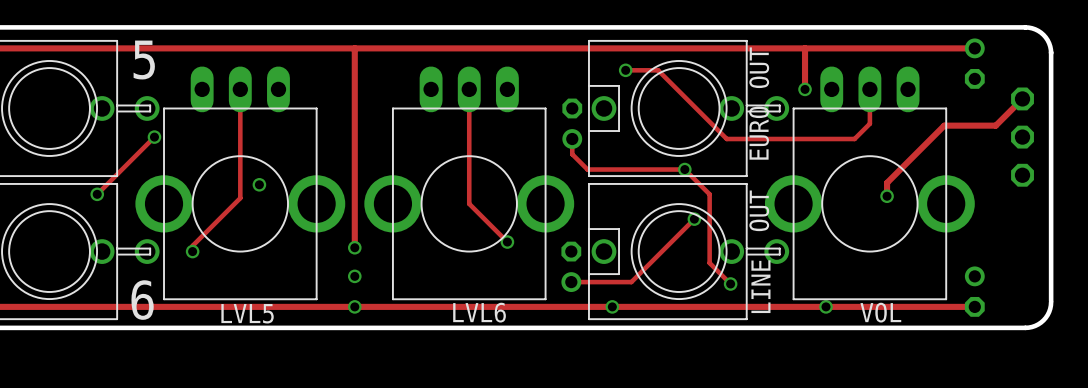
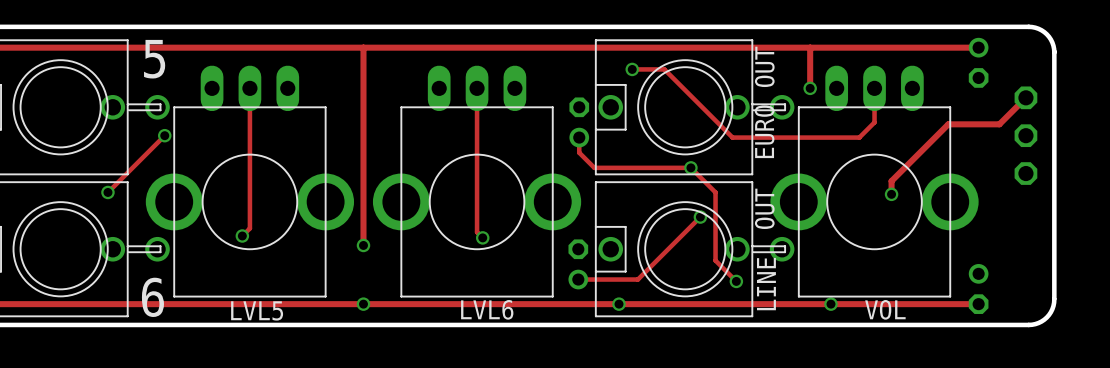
via: (259, 184) -> none
track: (240, 198) (192, 245) (192, 251) -> (249, 196) (249, 228) (242, 236)
track: (469, 203) (507, 242) -> (477, 201) (477, 232) (482, 237)
via: none -> (242, 236)
via position: (507, 242) -> (482, 237)
via: (192, 251) -> none
via: (354, 276) -> none

